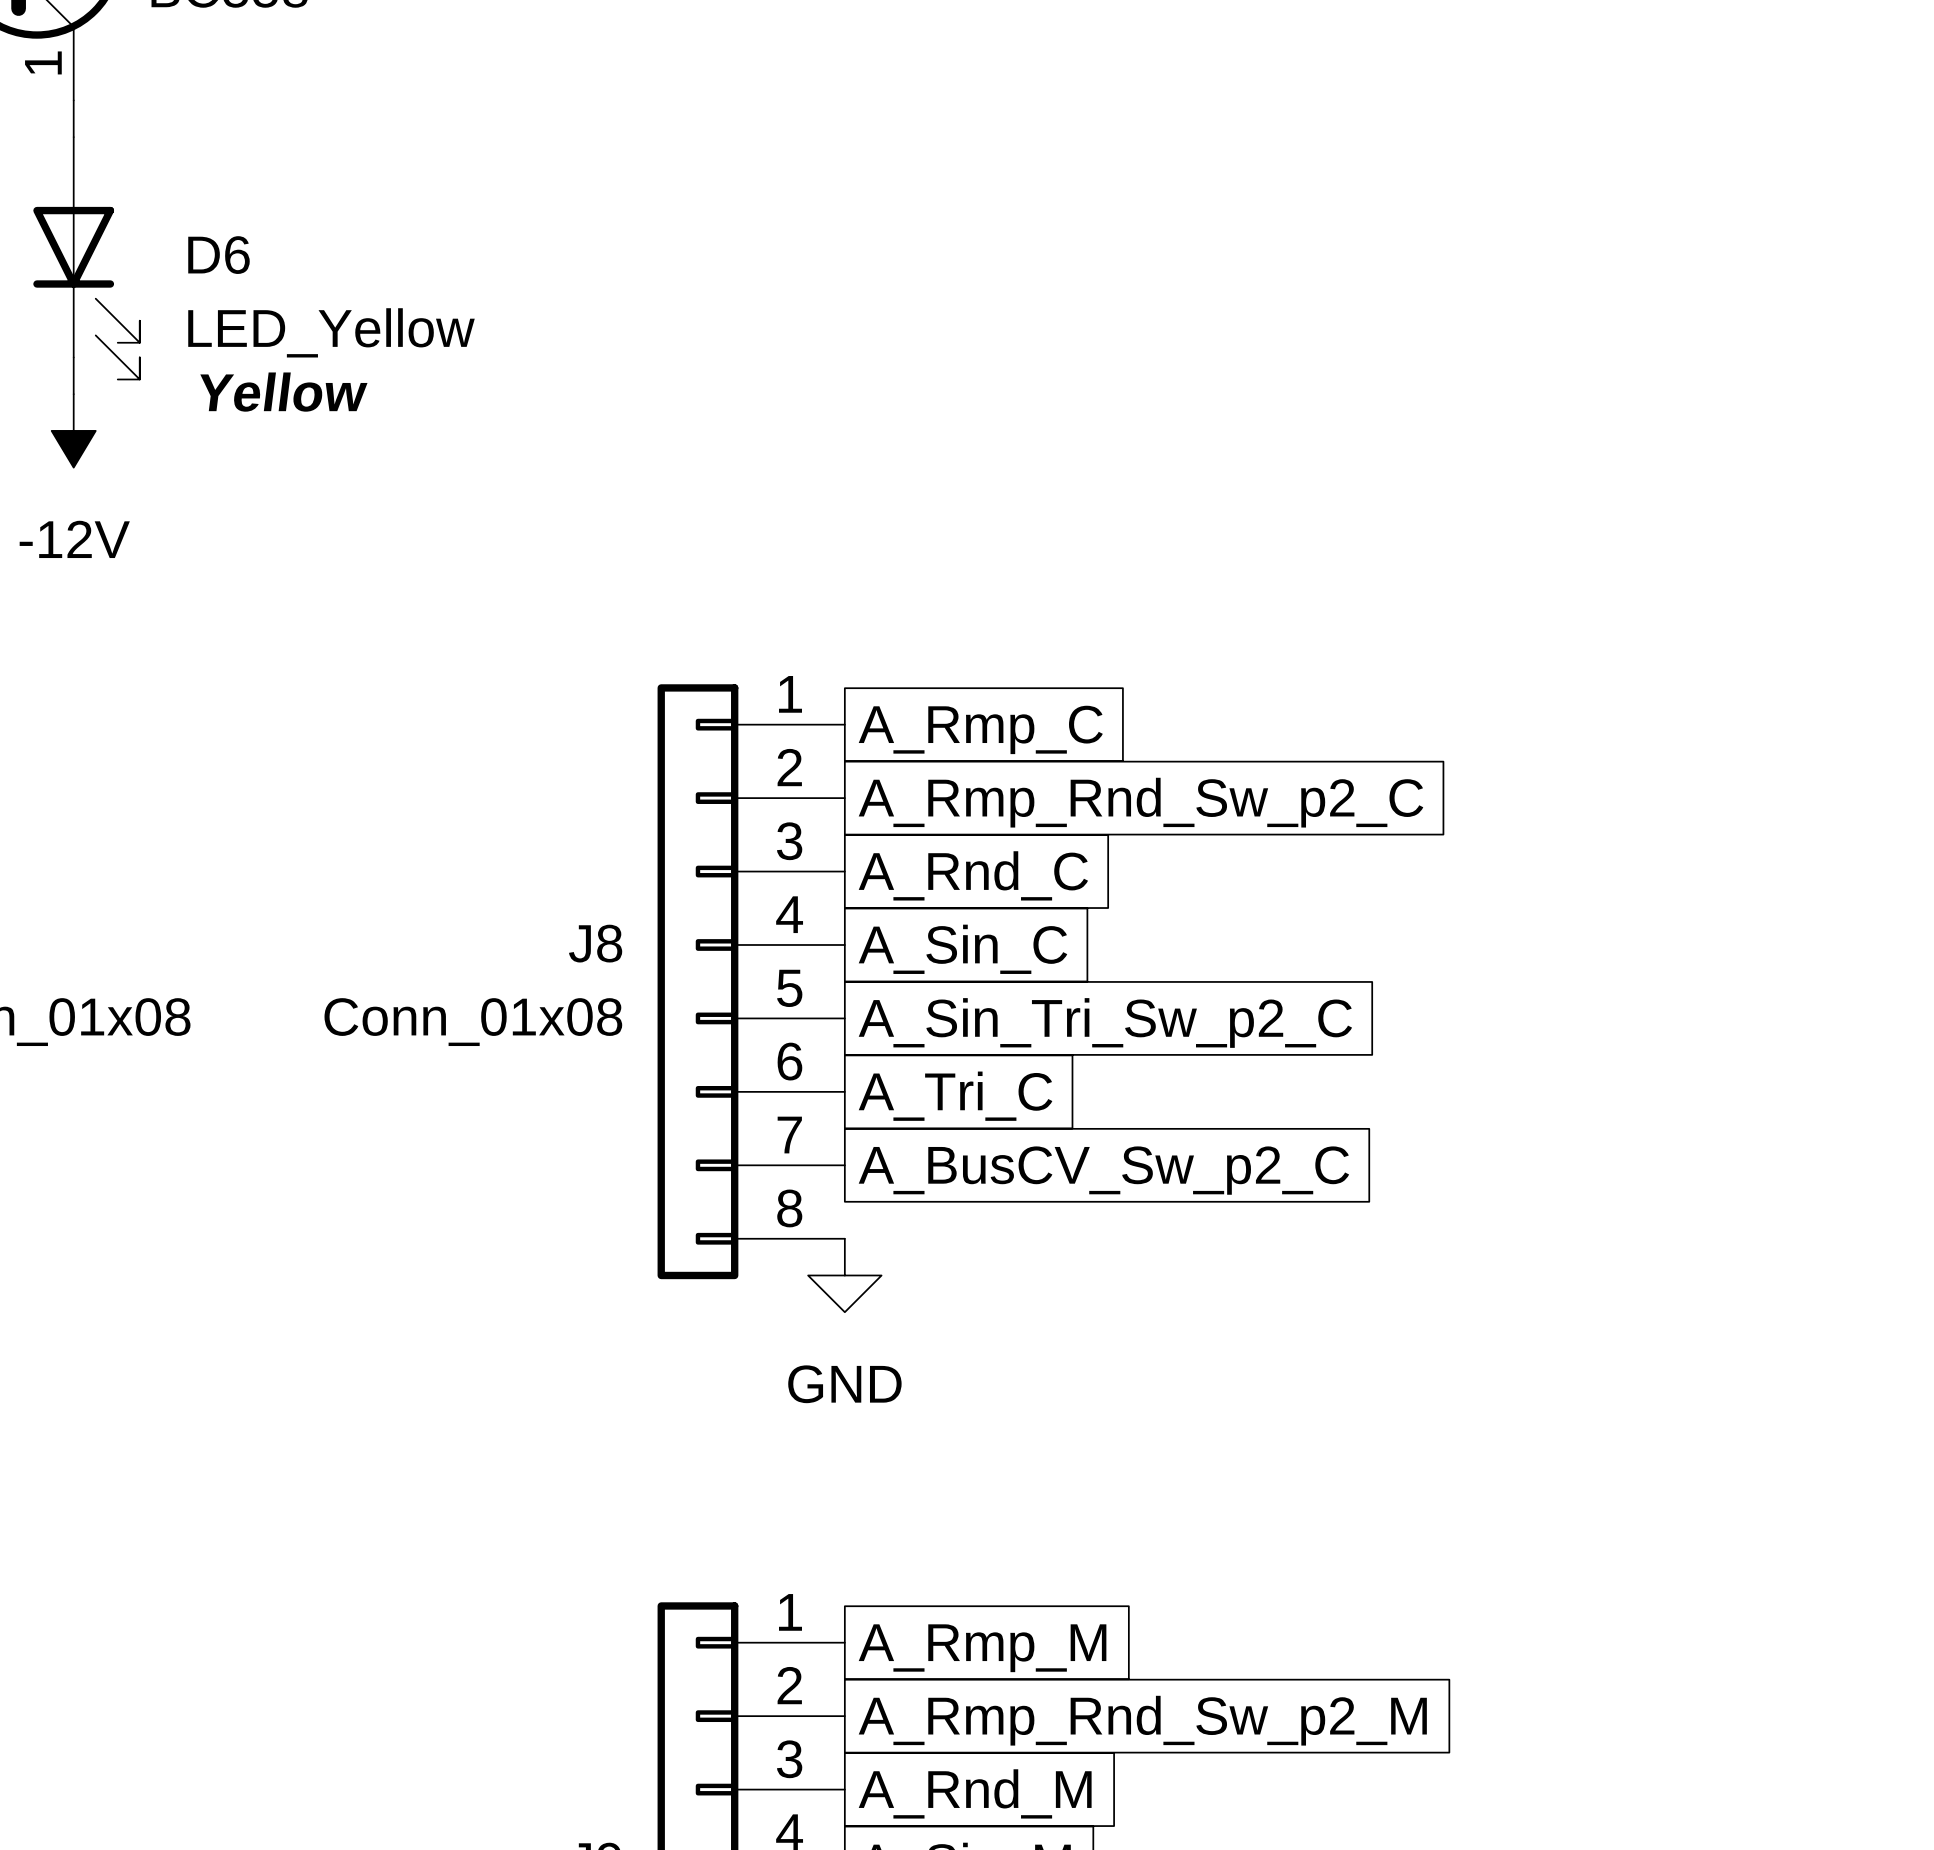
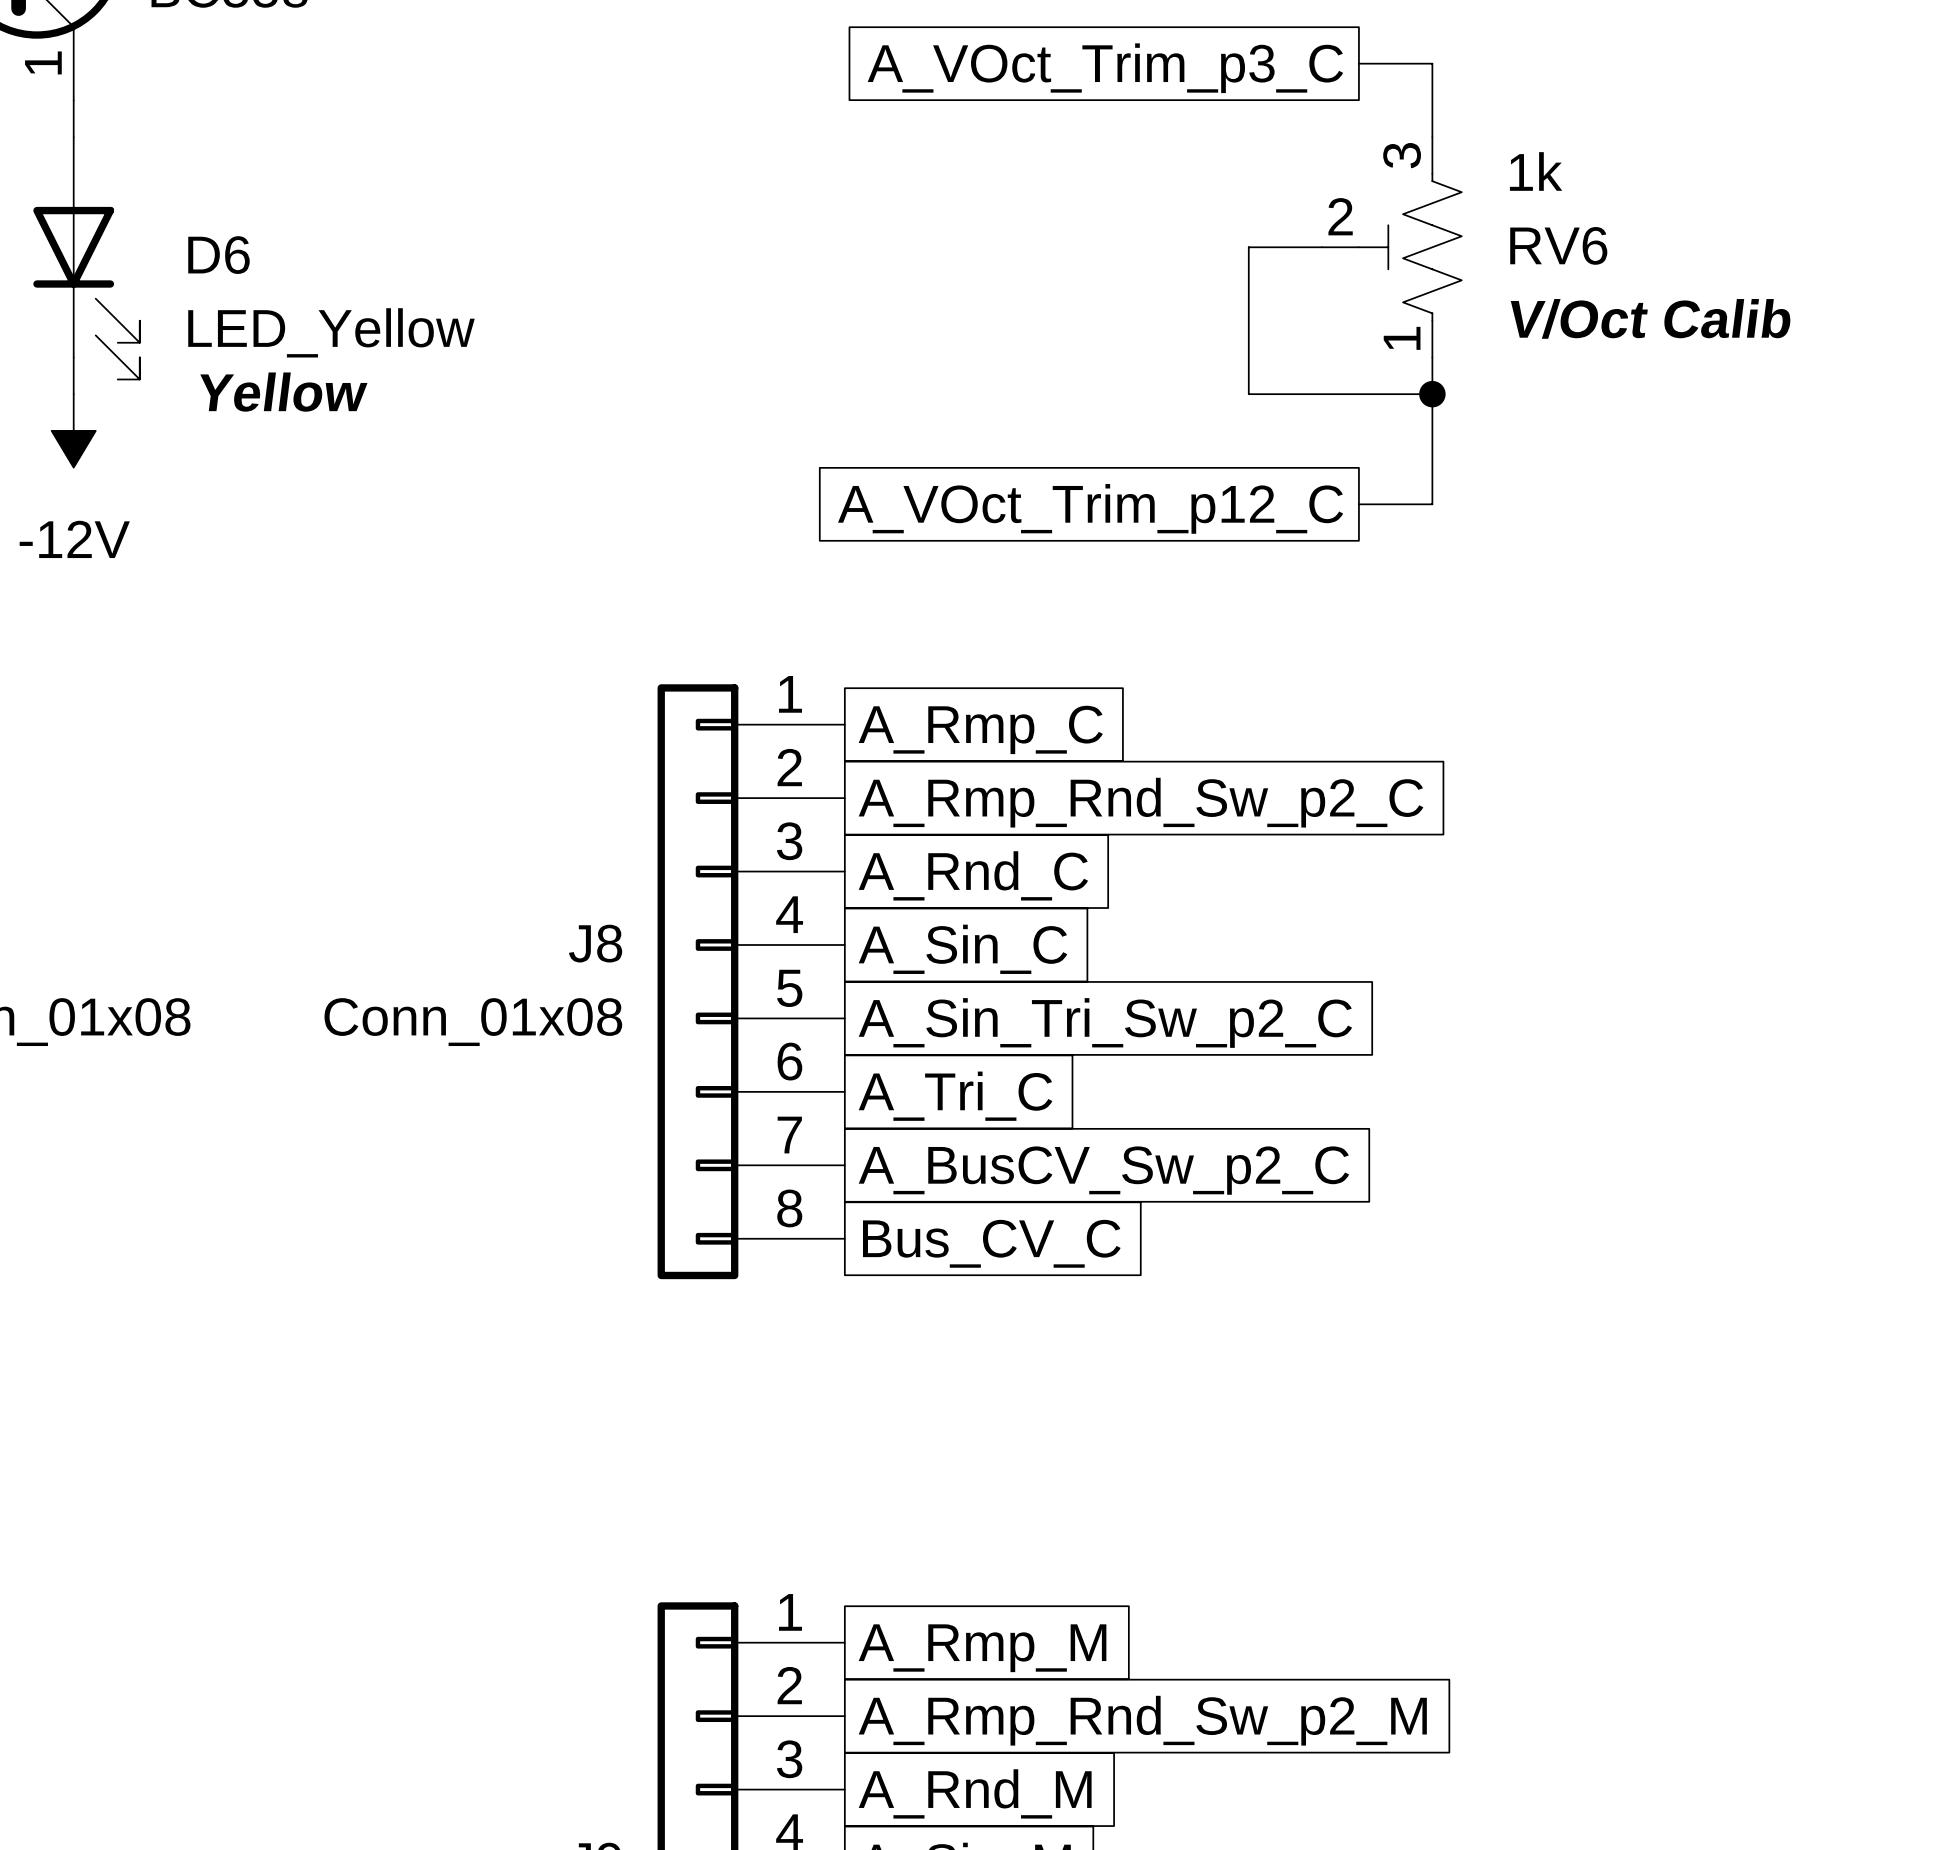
wire: none -> (1358, 63) (1432, 63) (1432, 137)
global label: none -> A_VOct_Trim_p3_C (1105, 68)
wire: none -> (1322, 247) (1248, 247) (1248, 394) (1432, 394)
RV6: none -> 1k (1392, 247)
wire: none -> (1432, 357) (1432, 504) (1358, 504)
junction: none -> (1432, 394)
global label: none -> A_VOct_Trim_p12_C (1090, 508)
global label: none -> Bus_CV_C (991, 1243)
power symbol: GND (844, 1275) -> none

